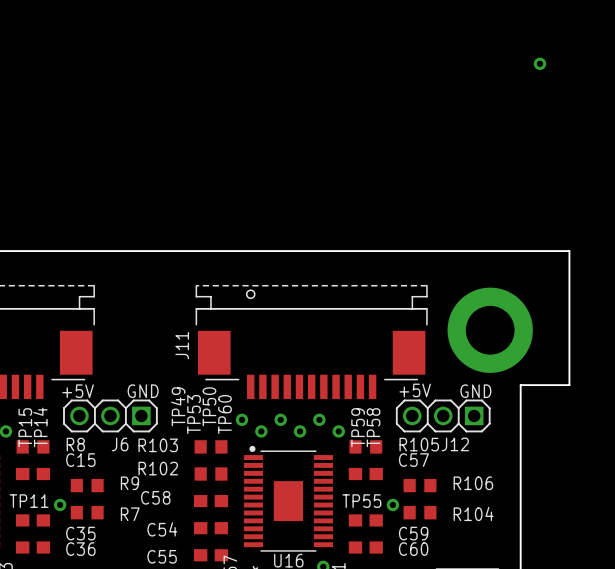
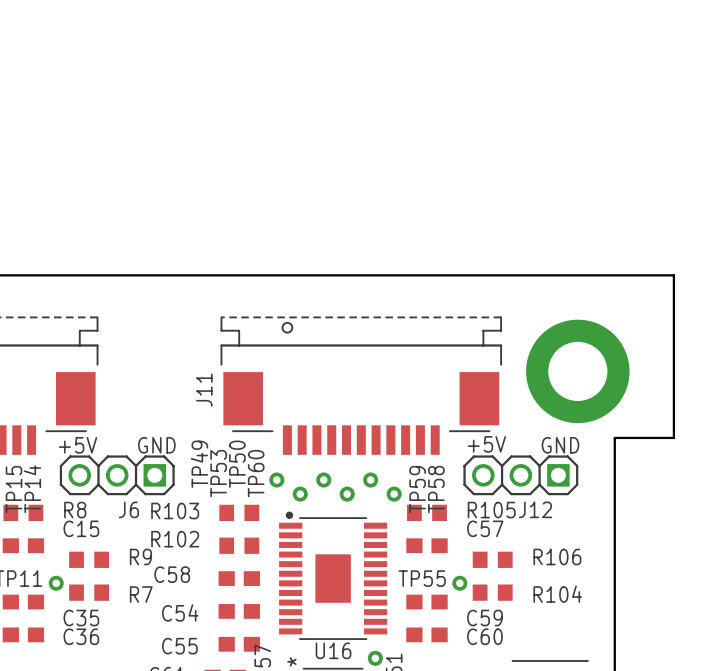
part: (539, 63) -> none

